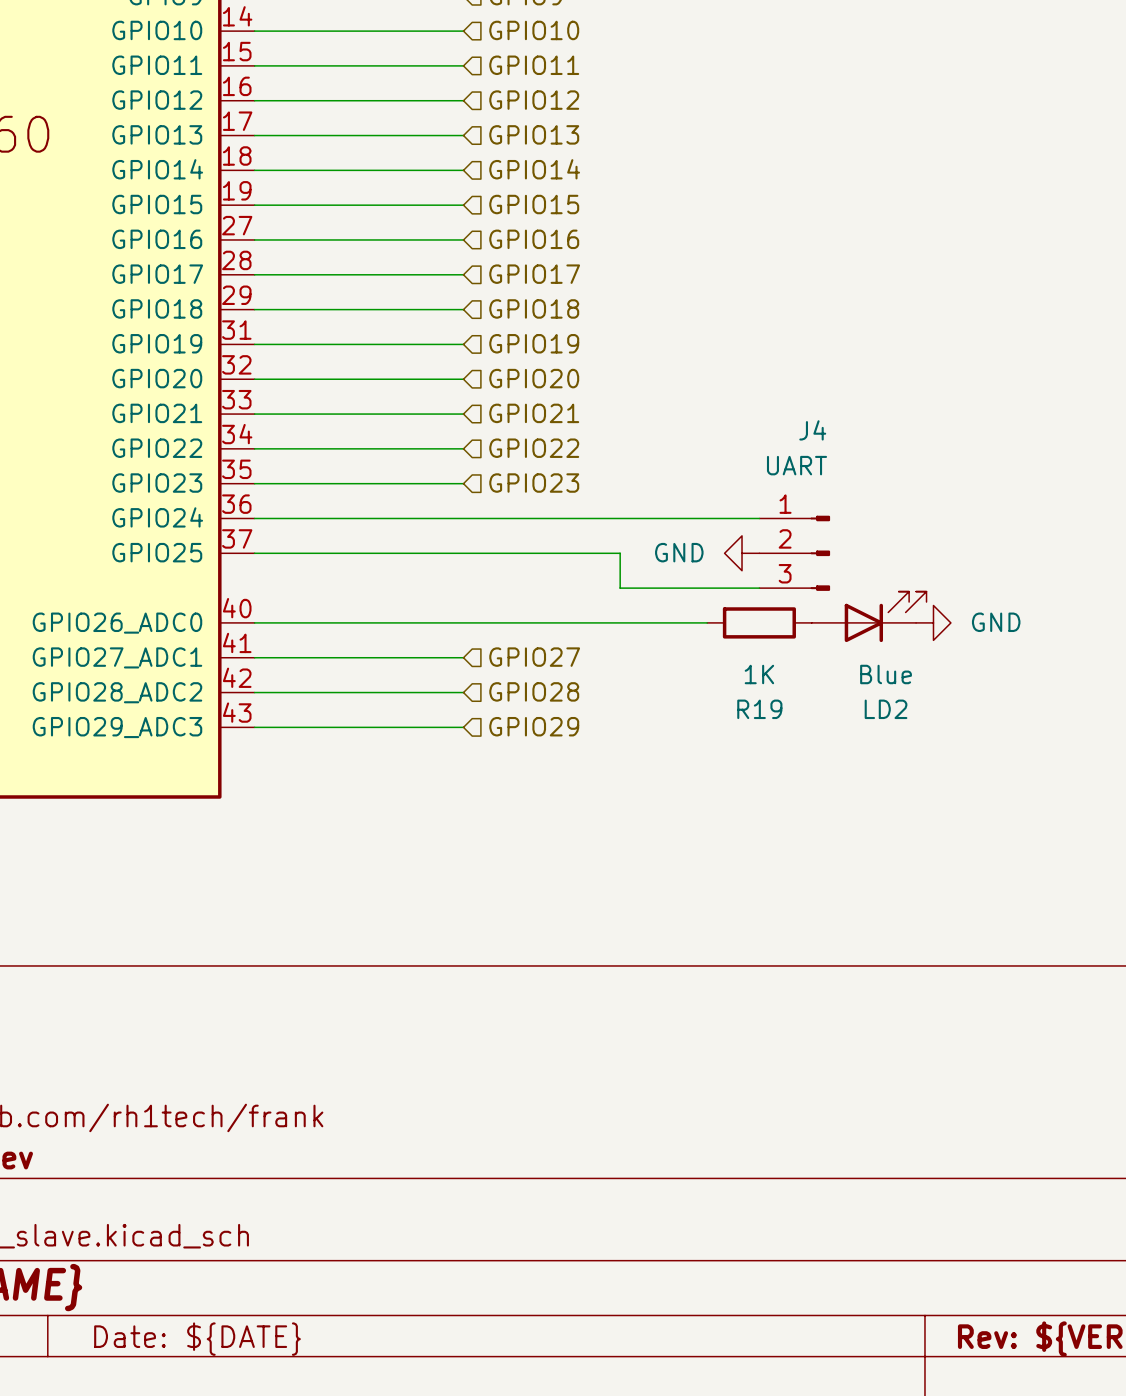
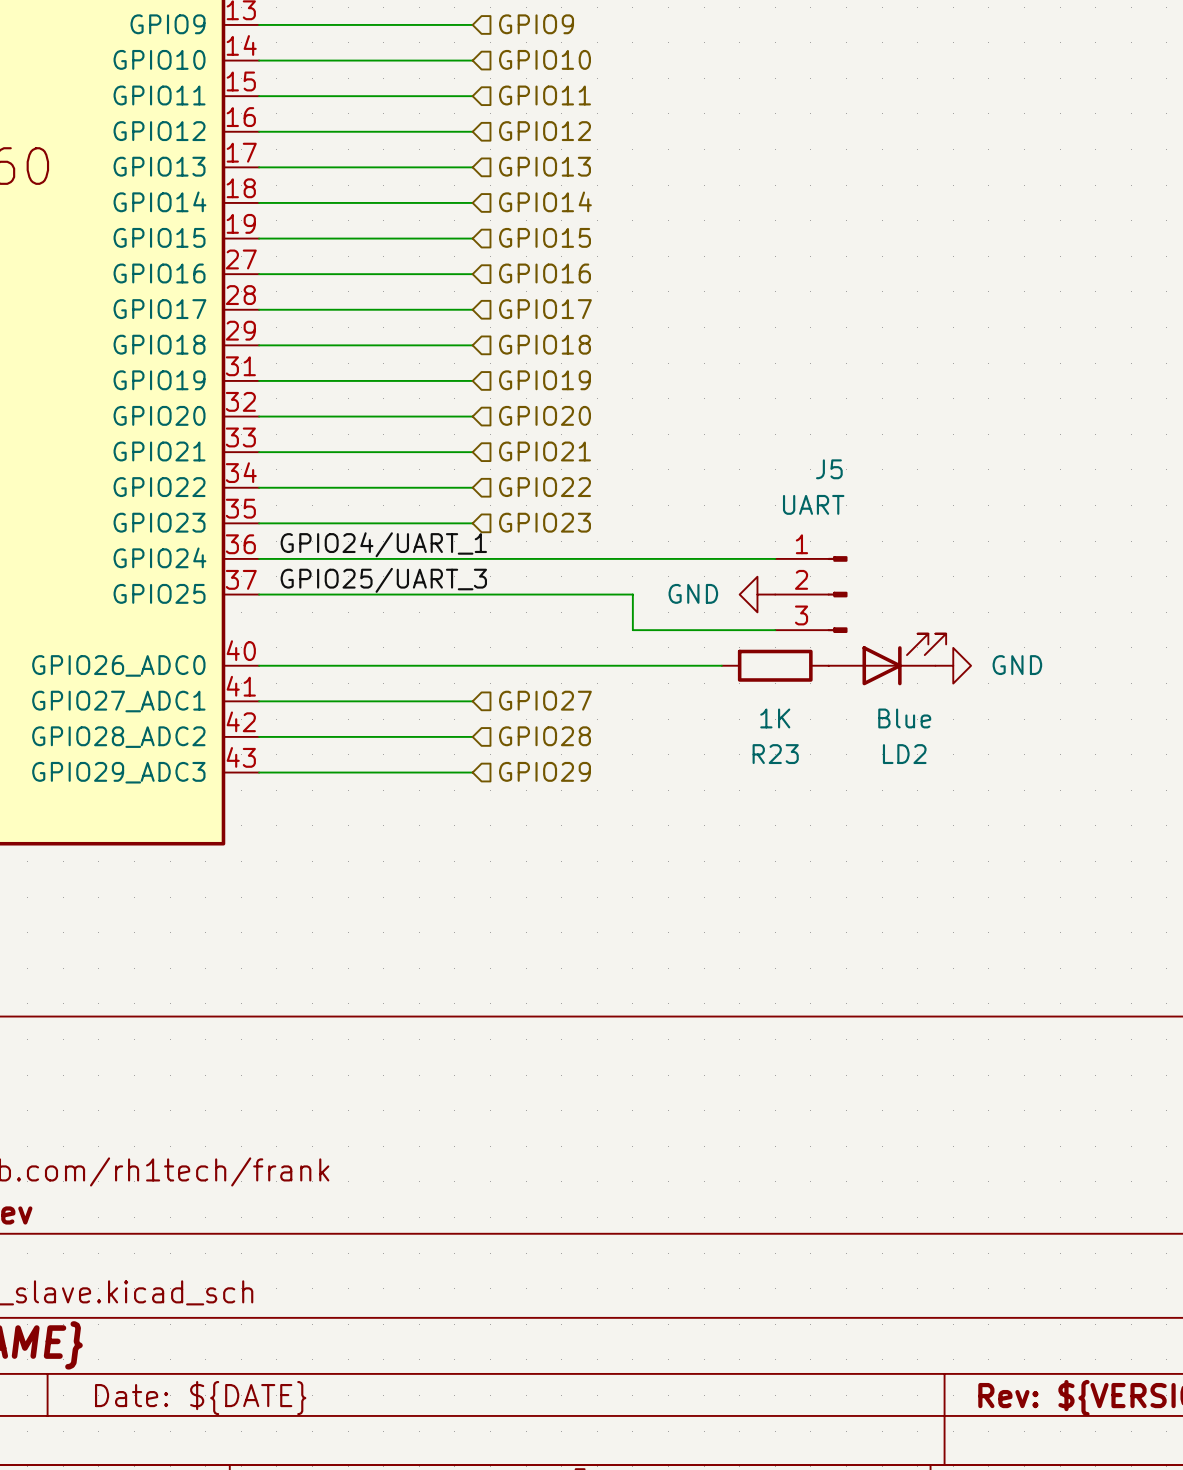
J4 name: J4 (812, 430) -> J5 (829, 469)
label: none -> GPIO24/UART_1 (383, 544)
label: none -> GPIO25/UART_3 (383, 580)
R19 name: R19 (759, 709) -> R23 (775, 754)

